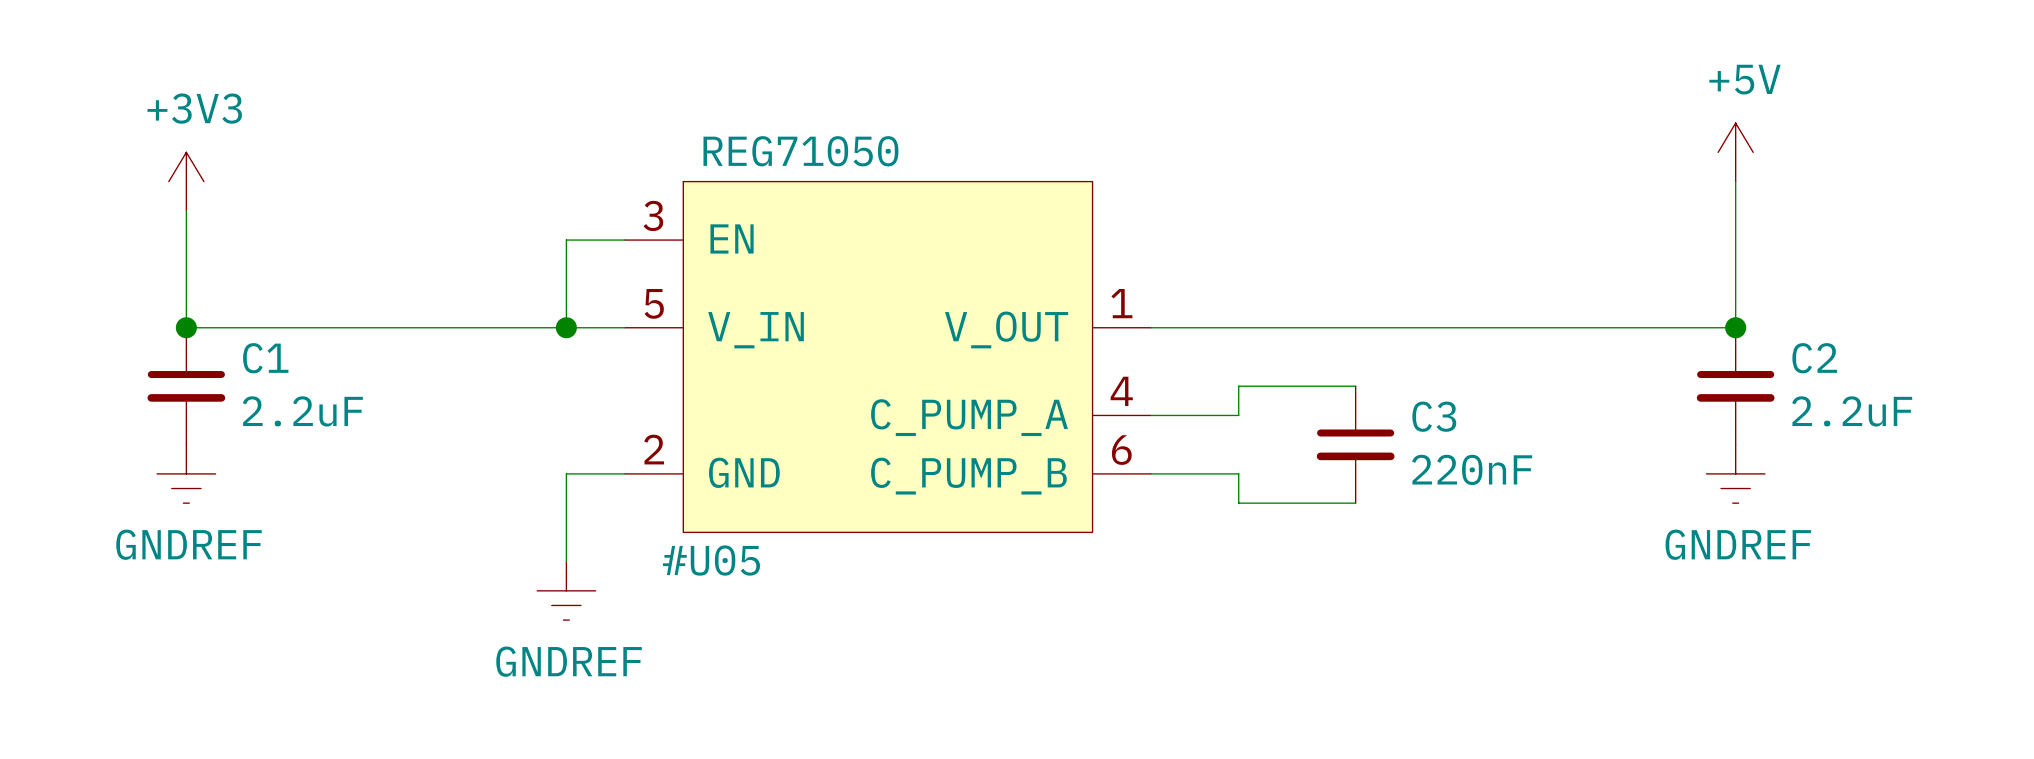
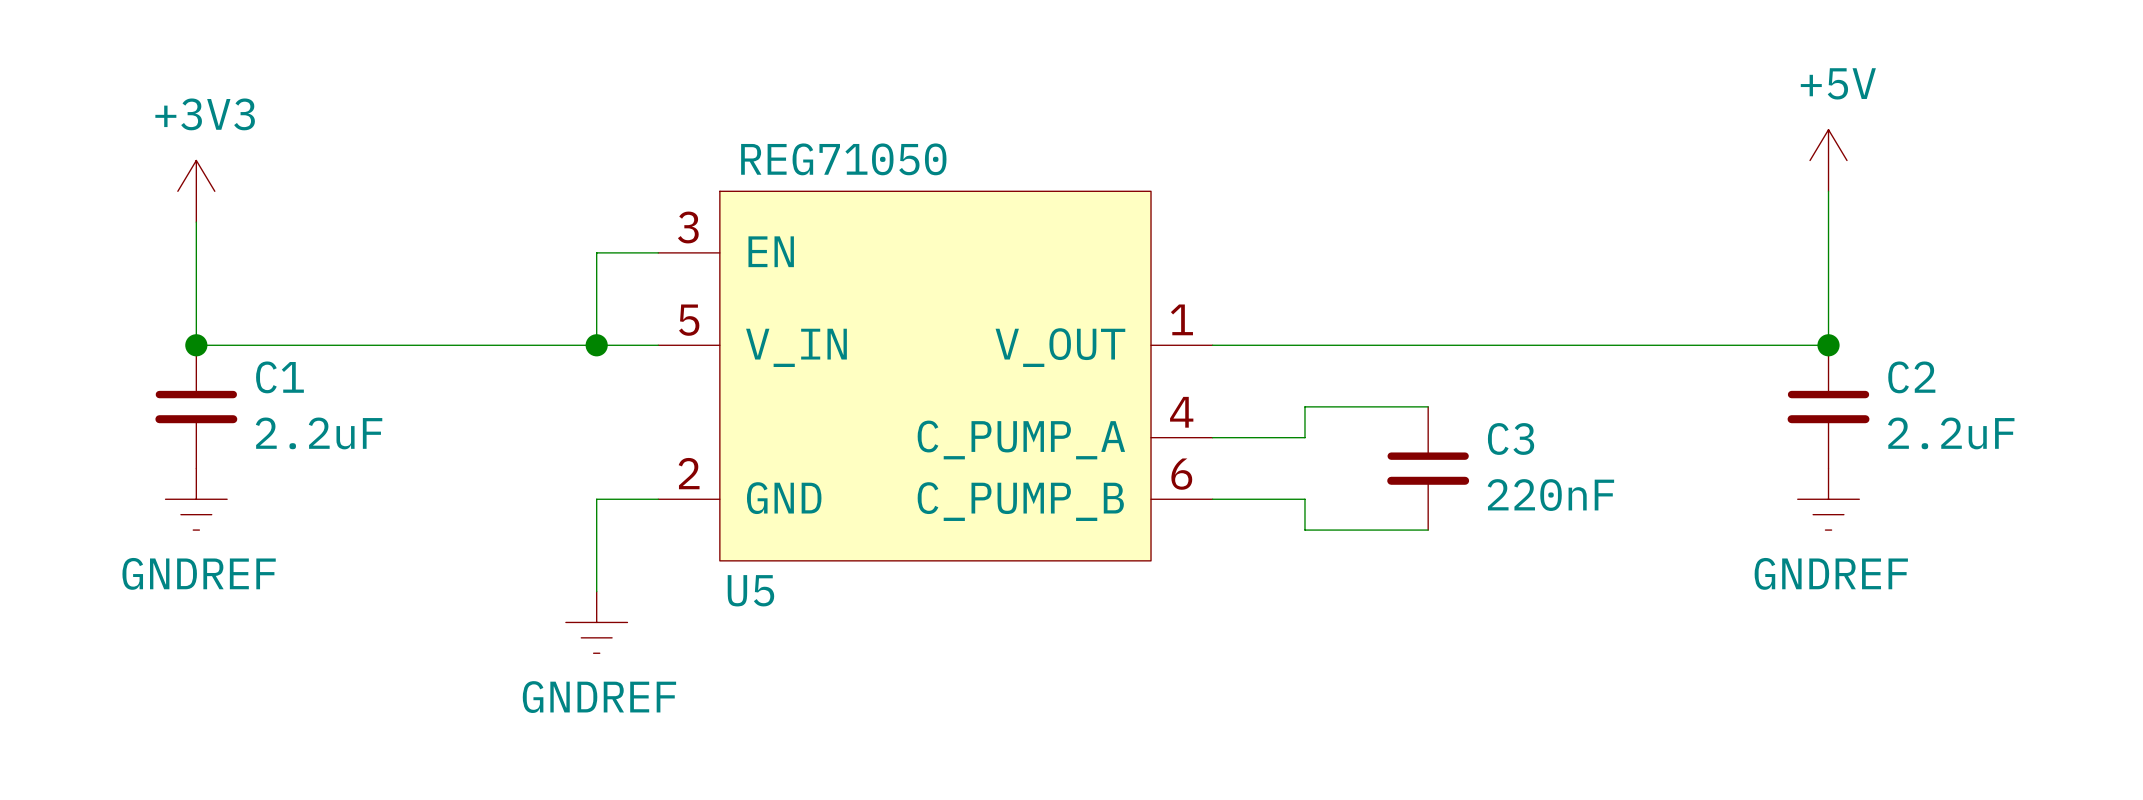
#U05: REG71050 (887, 356) -> none
U5: none -> REG71050 (935, 376)

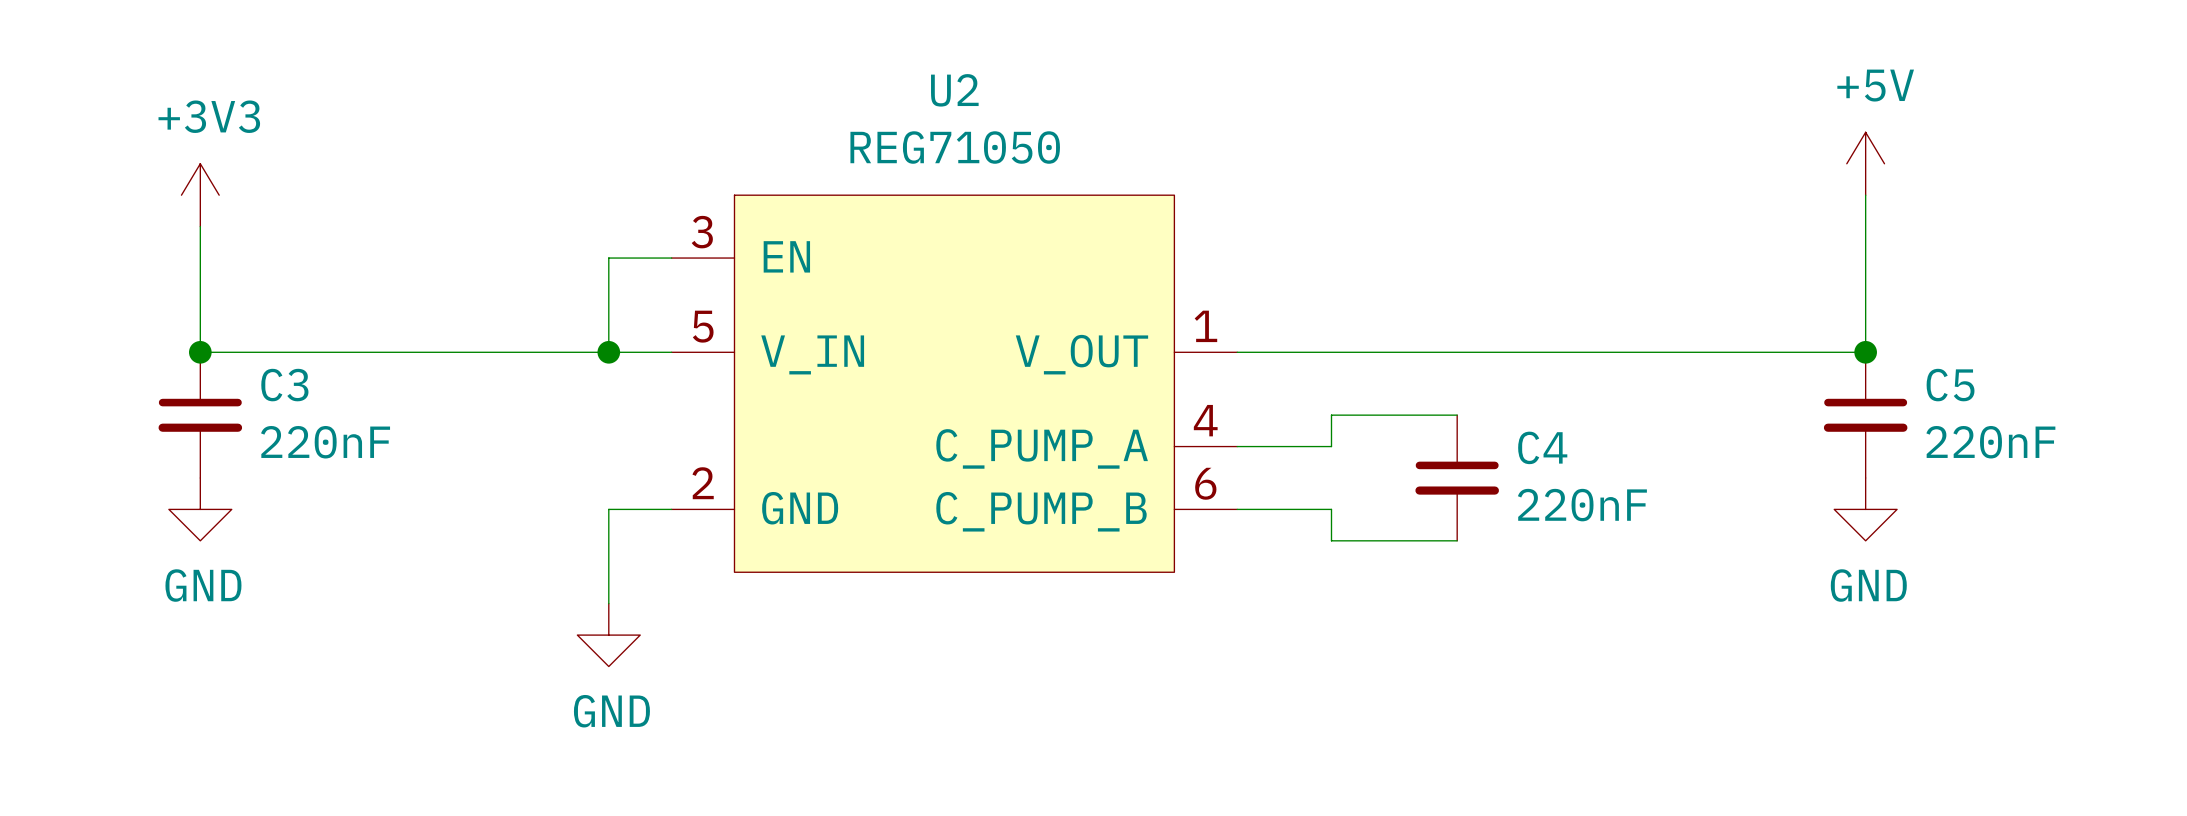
U5 value position: REG71050 (843, 159) -> REG71050 (955, 147)
C1 name: C1 (279, 377) -> C3 (284, 385)
C2 name: C2 (1911, 377) -> C5 (1950, 385)
C1 value: 2.2uF (319, 433) -> 220nF (325, 442)
C2 value: 2.2uF (1951, 433) -> 220nF (1990, 442)
C3 name: C3 (1511, 438) -> C4 (1542, 447)
power symbol: GNDREF (196, 499) -> GND (200, 509)
power symbol: GNDREF (1828, 499) -> GND (1865, 509)
U5 name: U5 (750, 590) -> U2 (954, 90)
power symbol: GNDREF (596, 622) -> GND (608, 635)

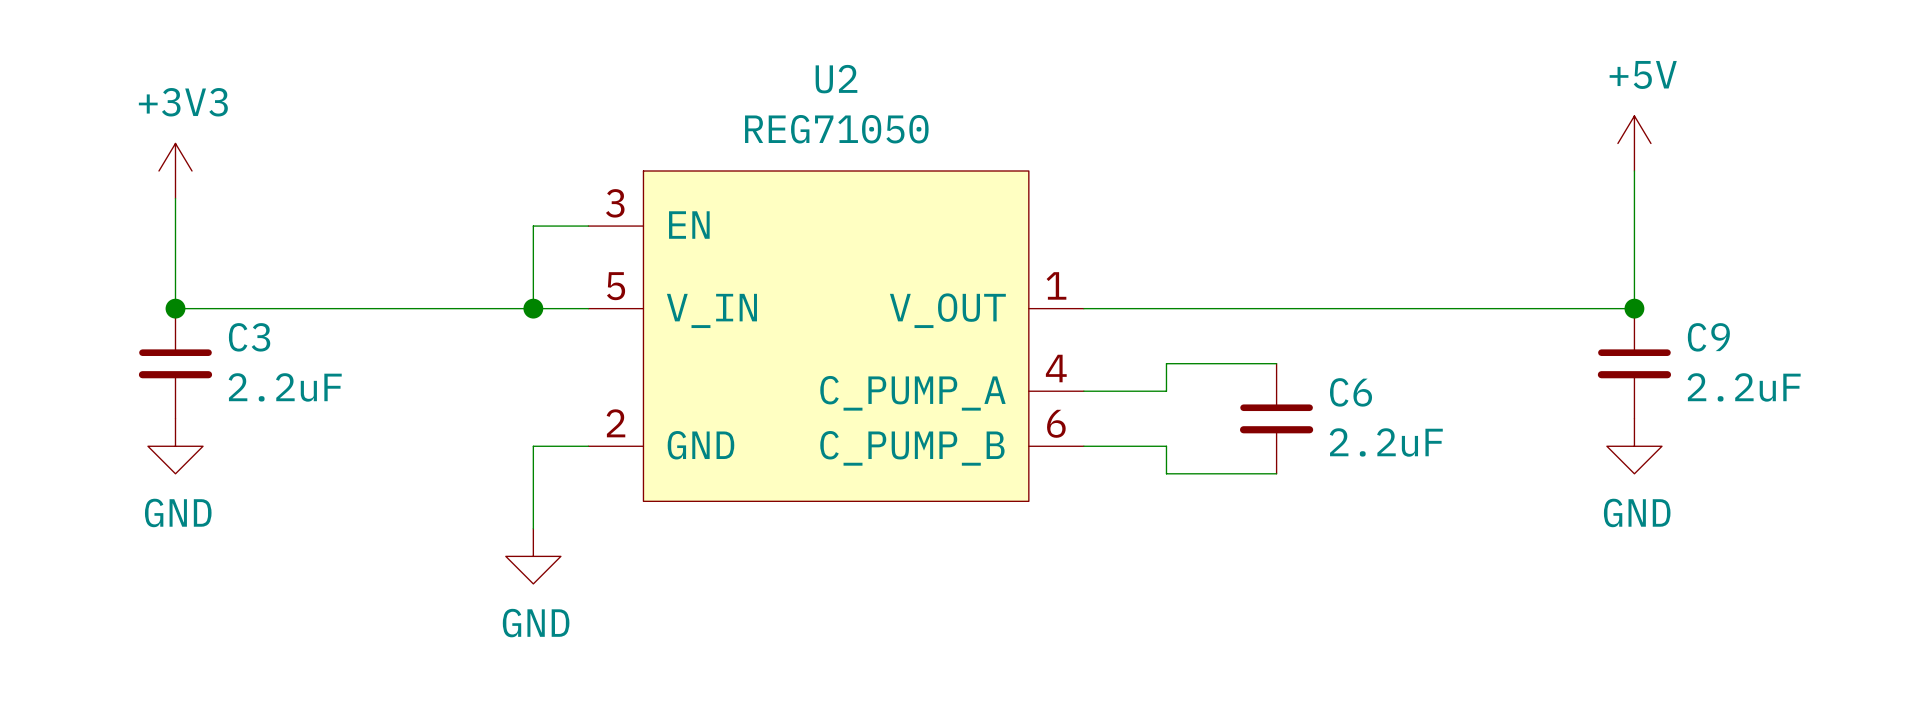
C5 name: C5 (1950, 385) -> C9 (1708, 337)
C3 value: 220nF (325, 442) -> 2.2uF (285, 387)
C5 value: 220nF (1990, 442) -> 2.2uF (1744, 387)
C4 name: C4 (1542, 447) -> C6 (1351, 392)
C4 value: 220nF (1582, 505) -> 2.2uF (1386, 442)

